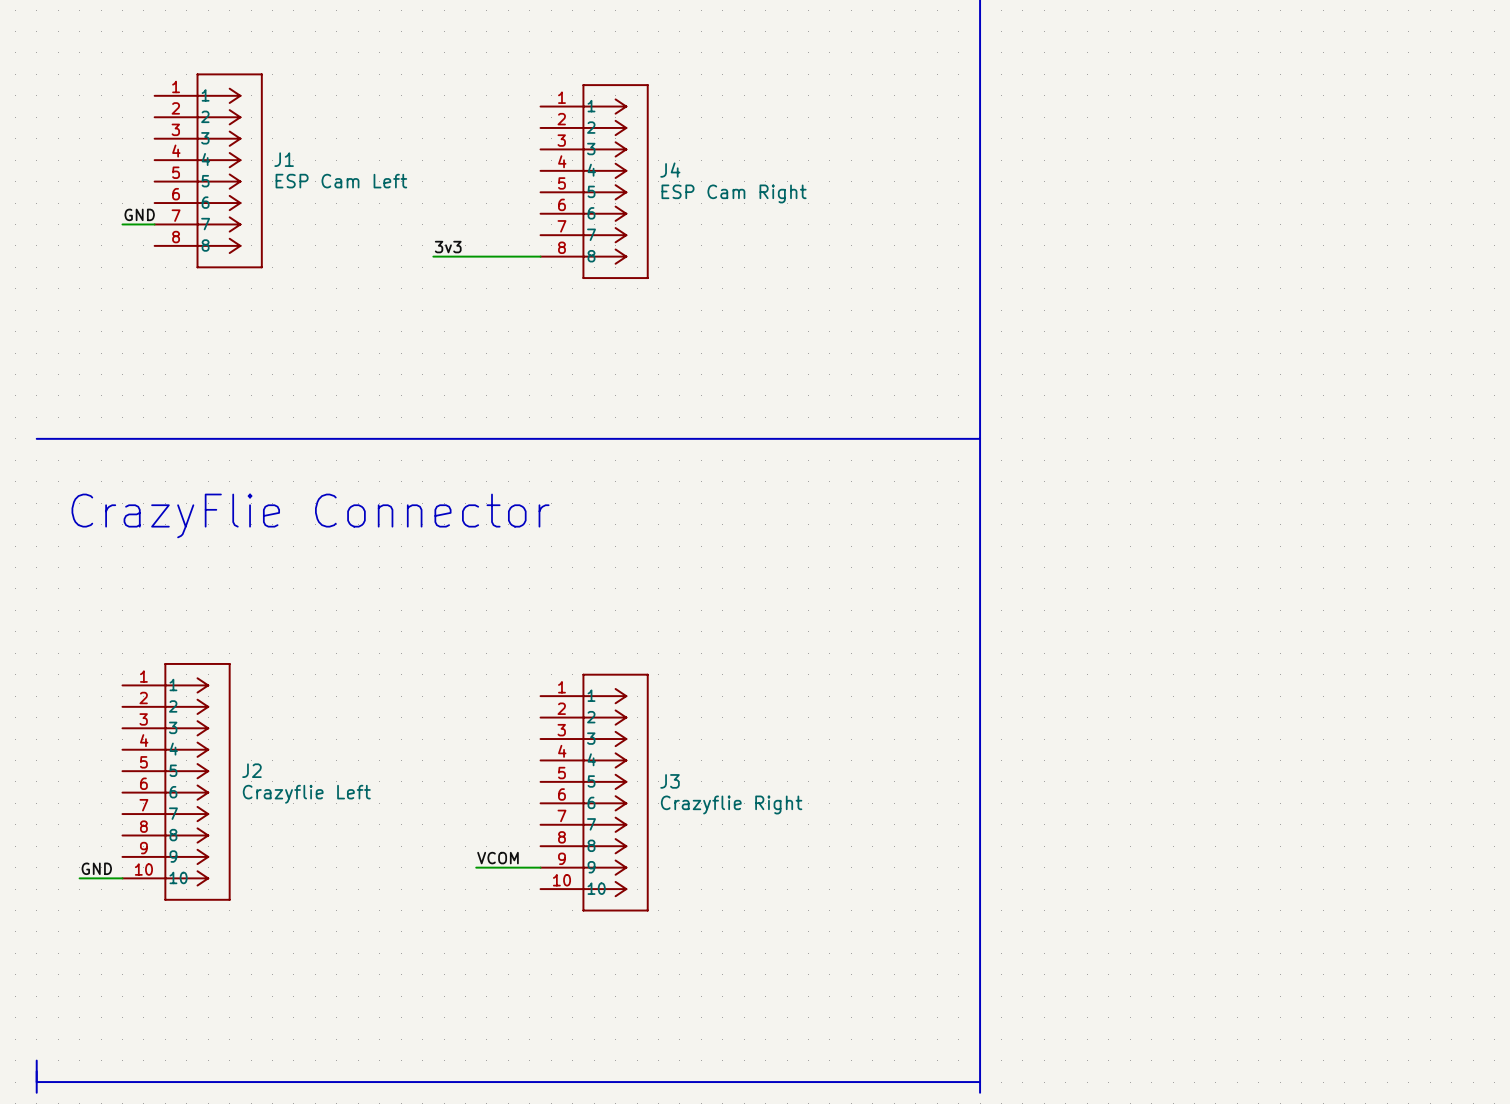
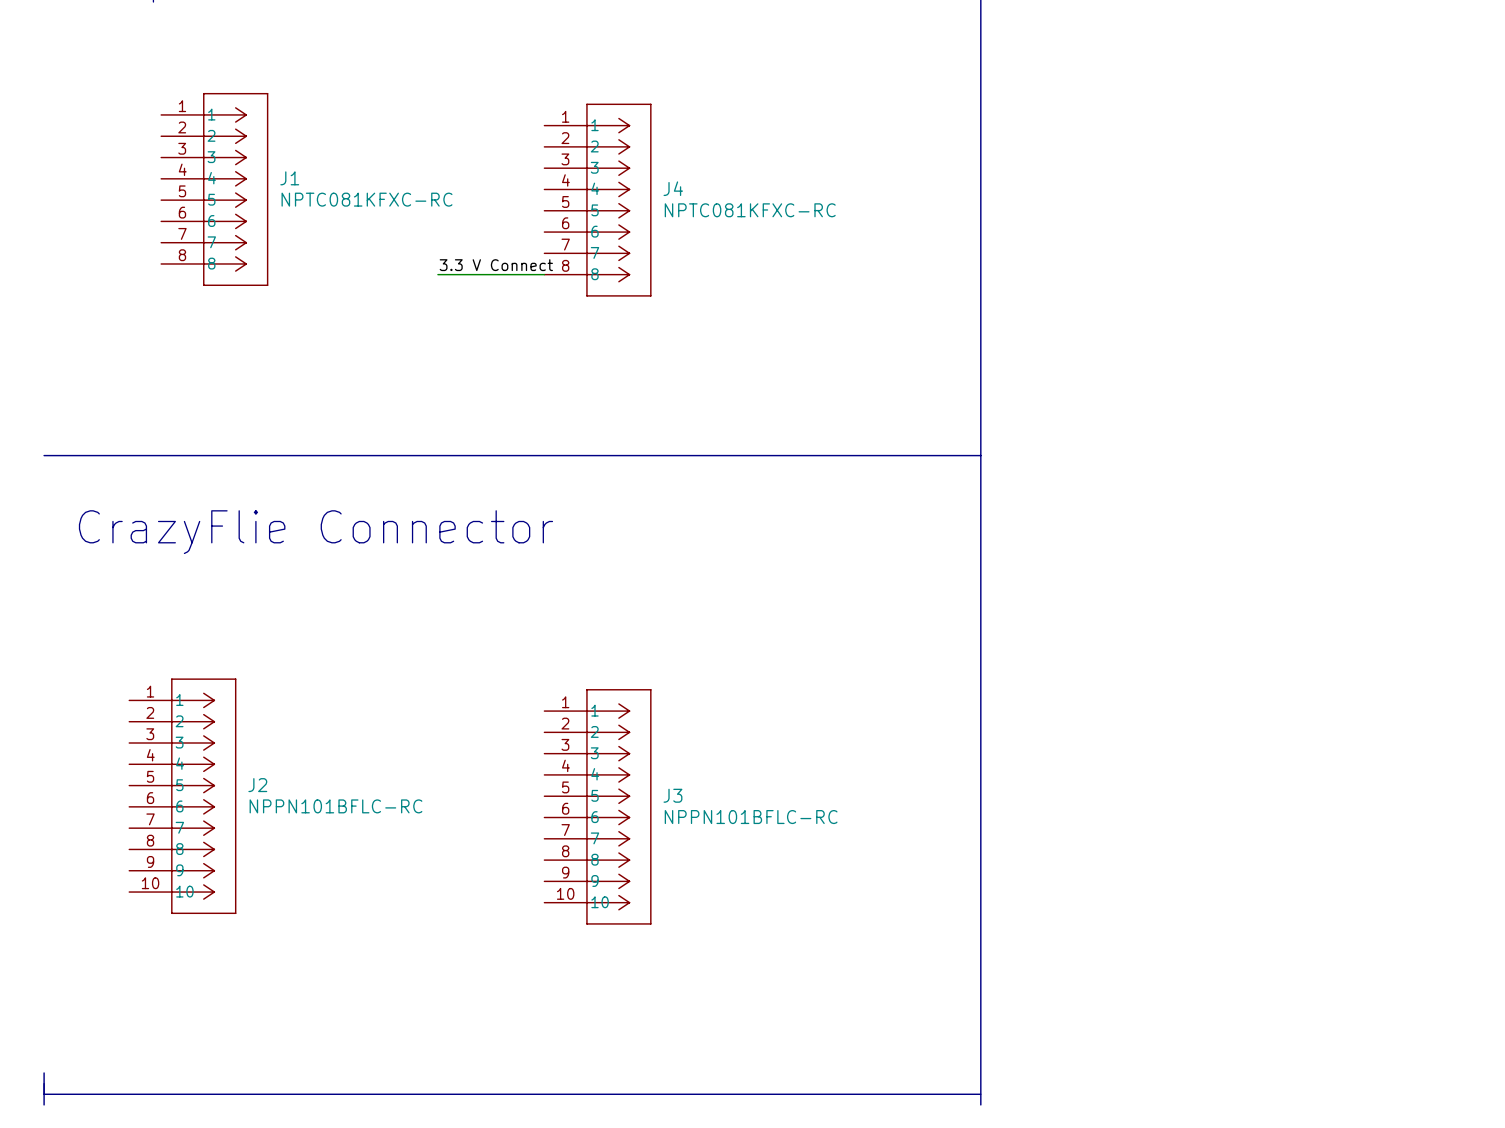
J1 value: ESP Cam Left (341, 181) -> NPTC081KFXC-RC (367, 199)
J4 value: ESP Cam Right (734, 193) -> NPTC081KFXC-RC (750, 210)
label: GND (139, 214) -> none
wire: (122, 224) (154, 224) -> none
label: 3v3 (448, 247) -> 3.3 V Connect (496, 265)
J2 value: Crazyflie Left (306, 794) -> NPPN101BFLC-RC (335, 806)
J3 value: Crazyflie Right (731, 804) -> NPPN101BFLC-RC (751, 817)
label: VCOM (498, 858) -> none
wire: (476, 867) (540, 867) -> none
label: GND (96, 868) -> none
wire: (79, 878) (122, 878) -> none

